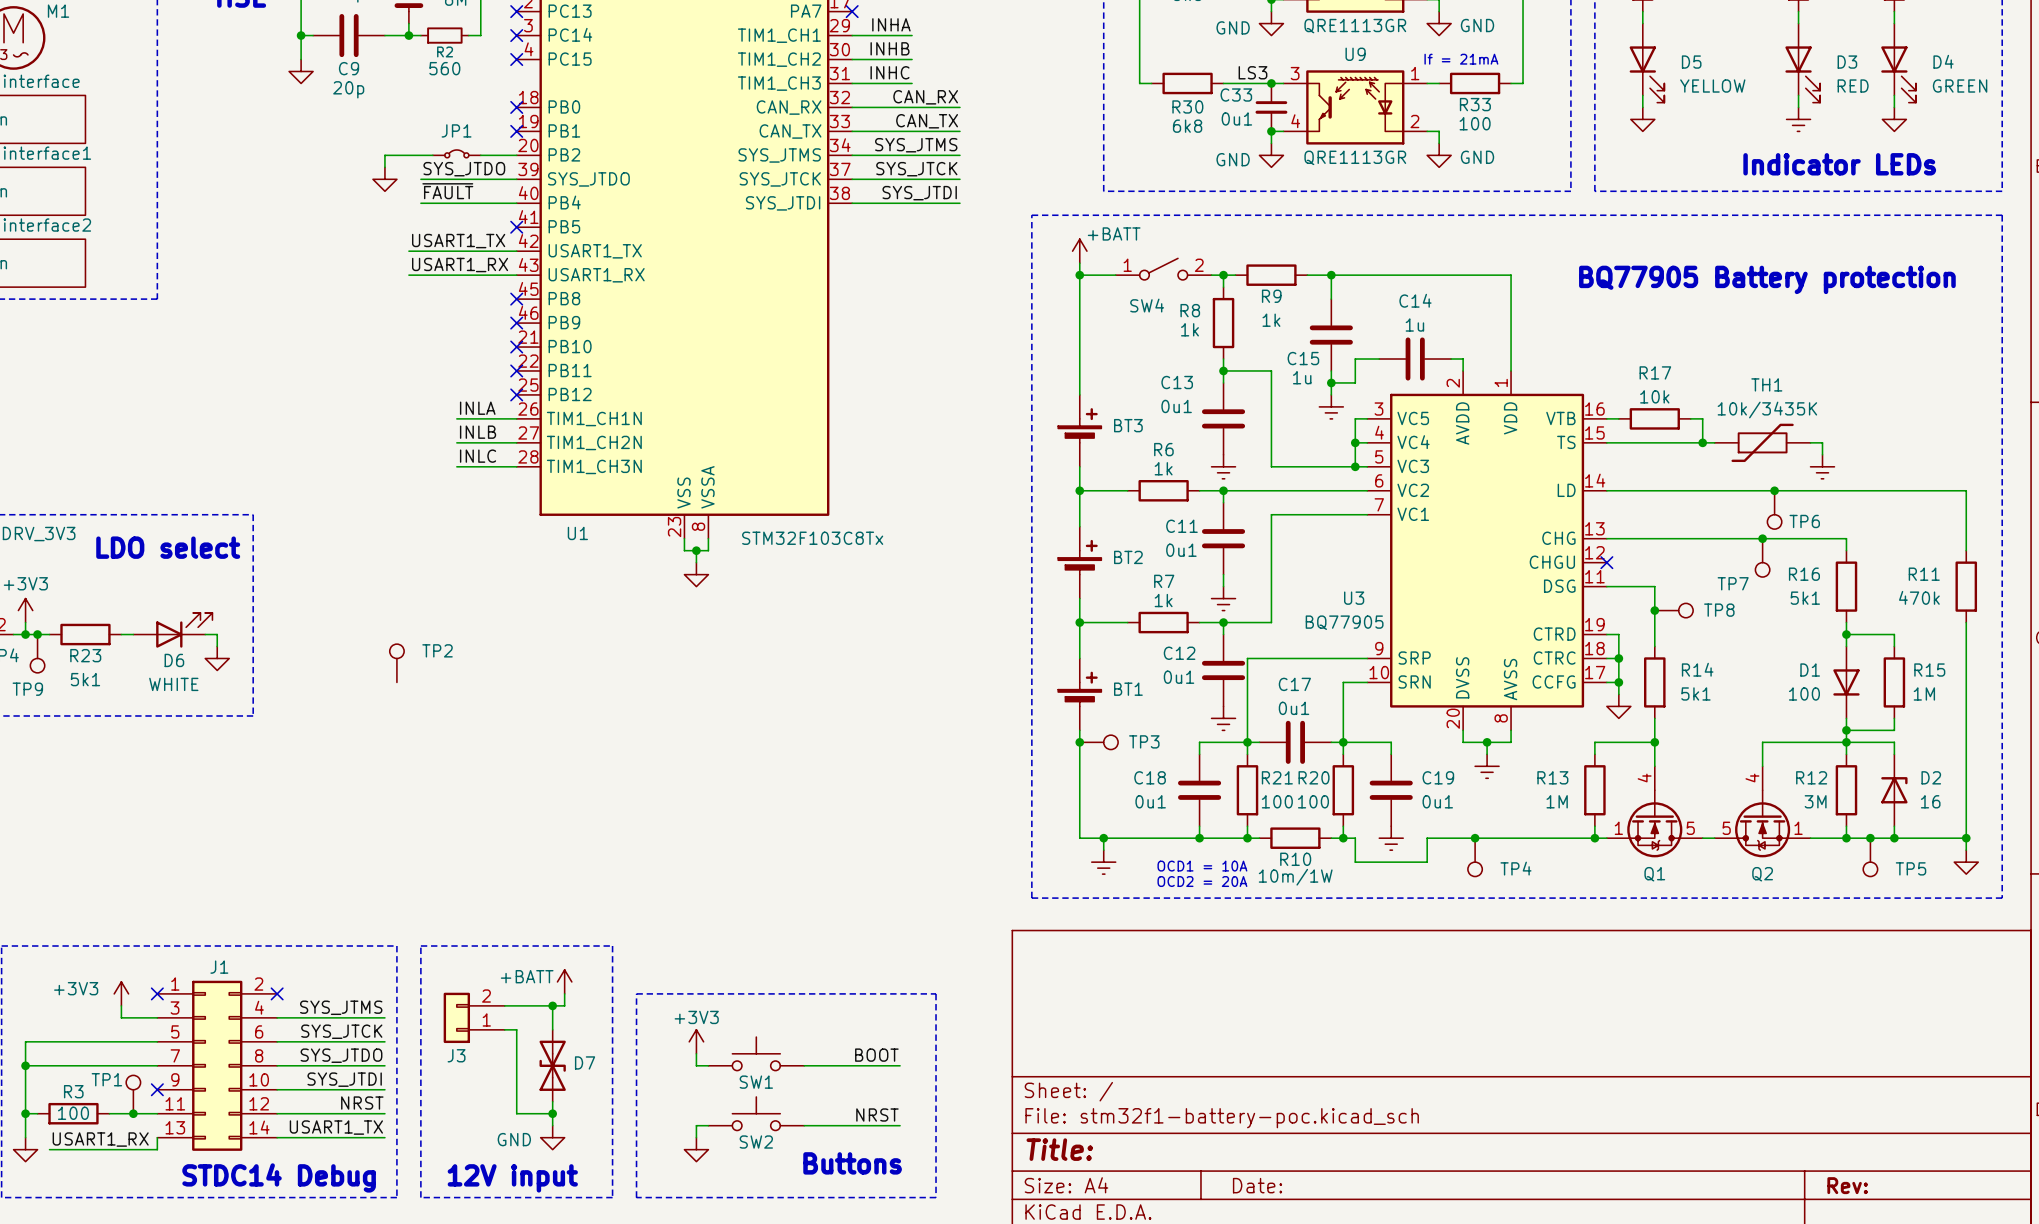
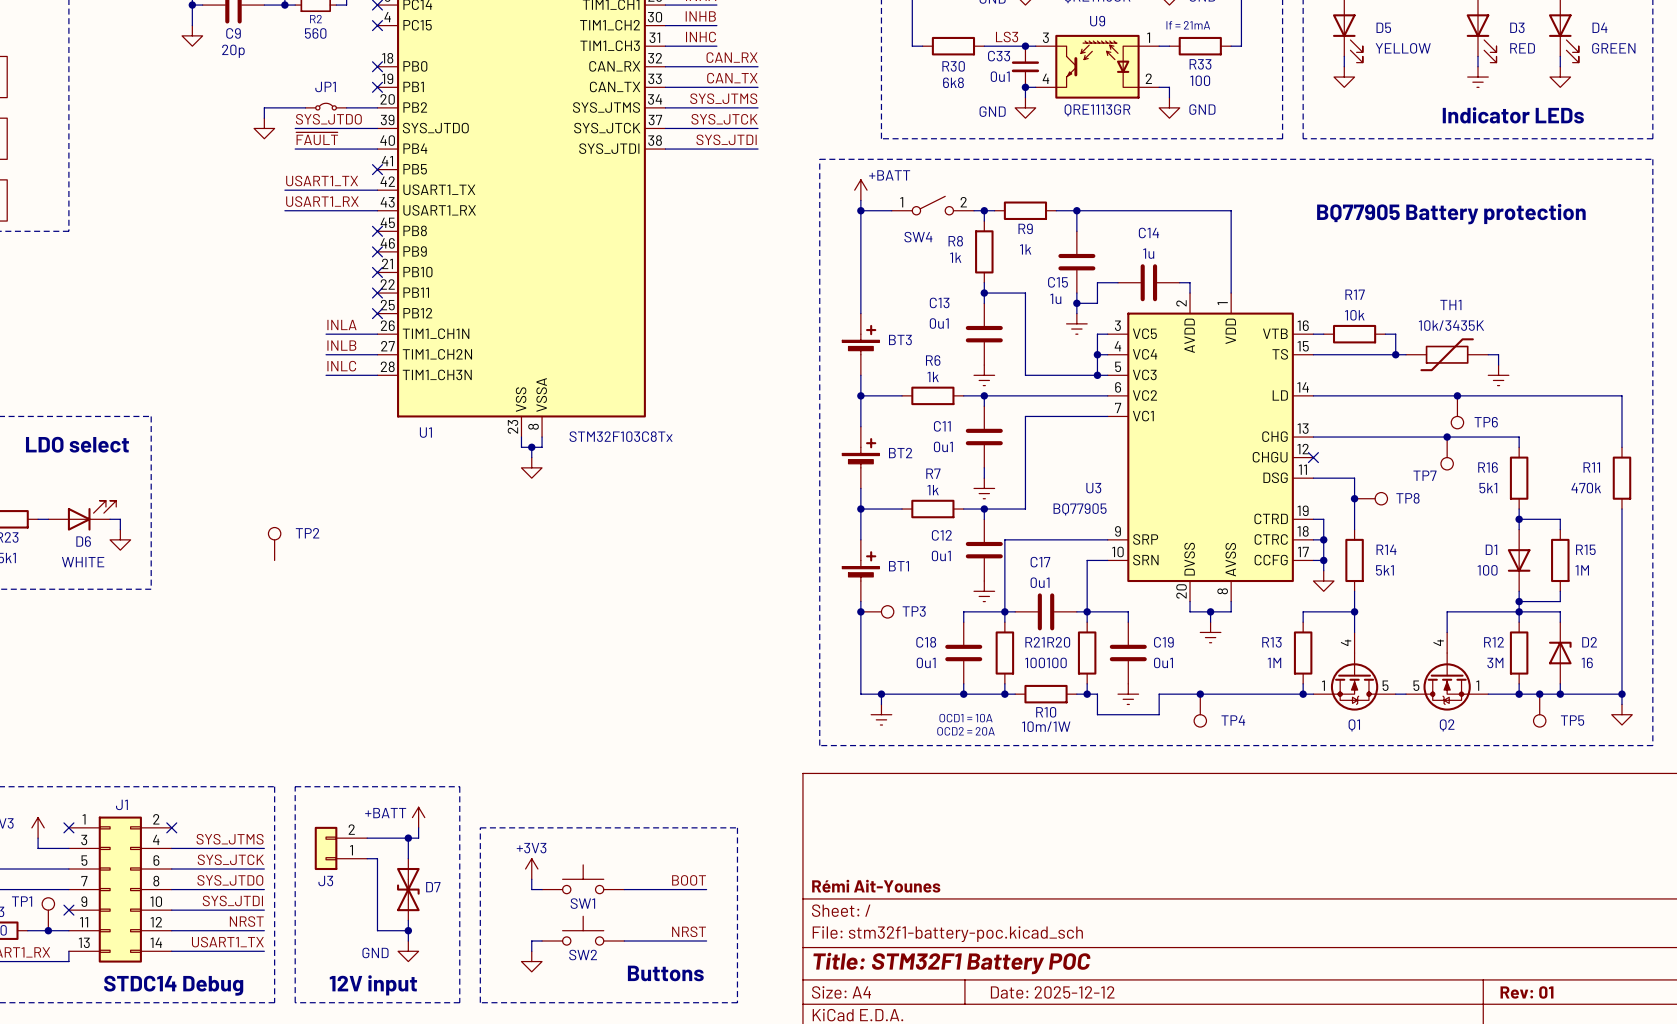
title block: none -> Rémi Ait-Younes (876, 886)
title block: Title: (1059, 1149) -> Title: STM32F1 Battery POC (951, 963)
title block: Date: (1257, 1185) -> Date: 2025-12-12 (1052, 992)
title block: Rev: (1847, 1185) -> Rev: 01 (1526, 992)

